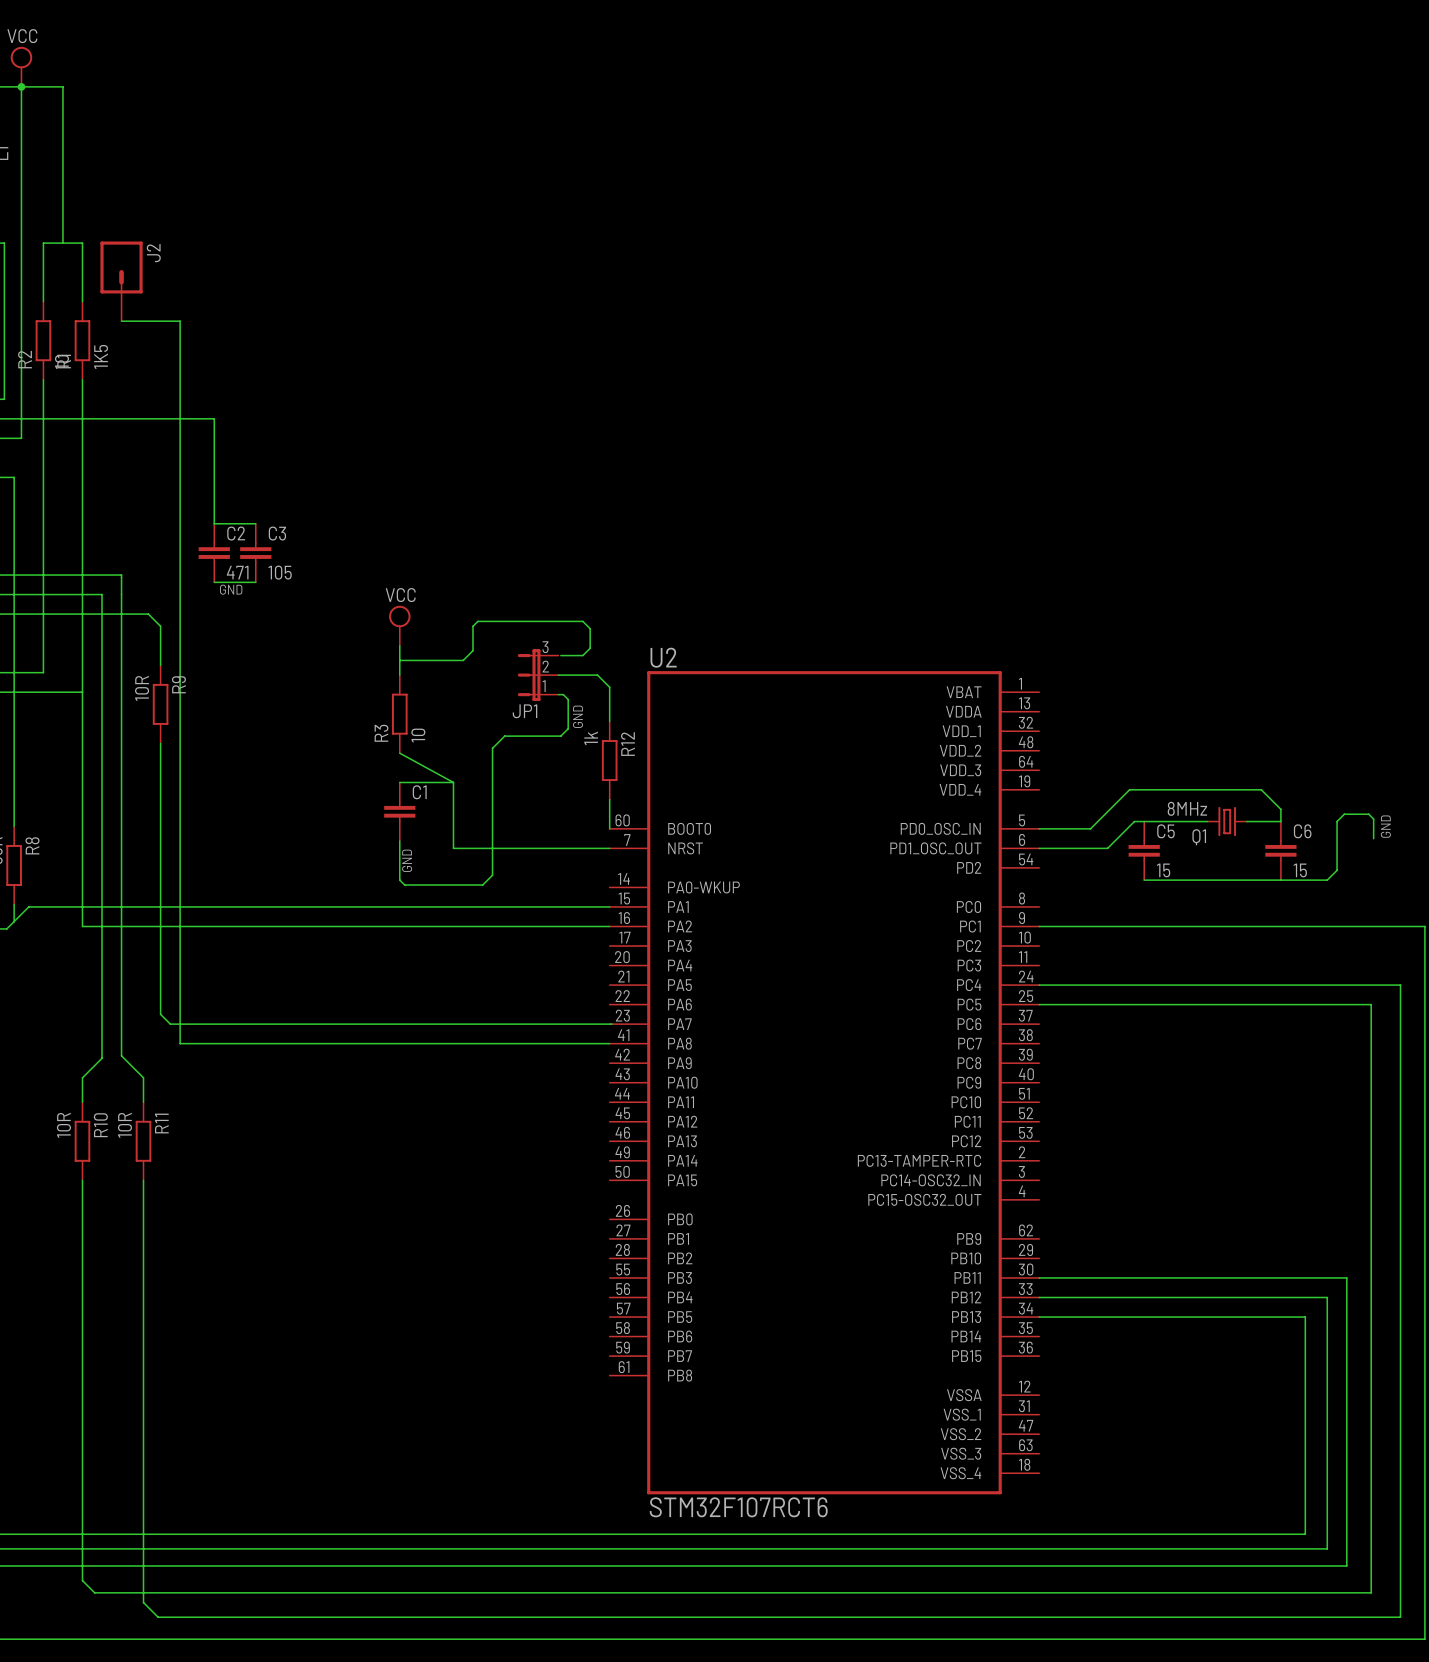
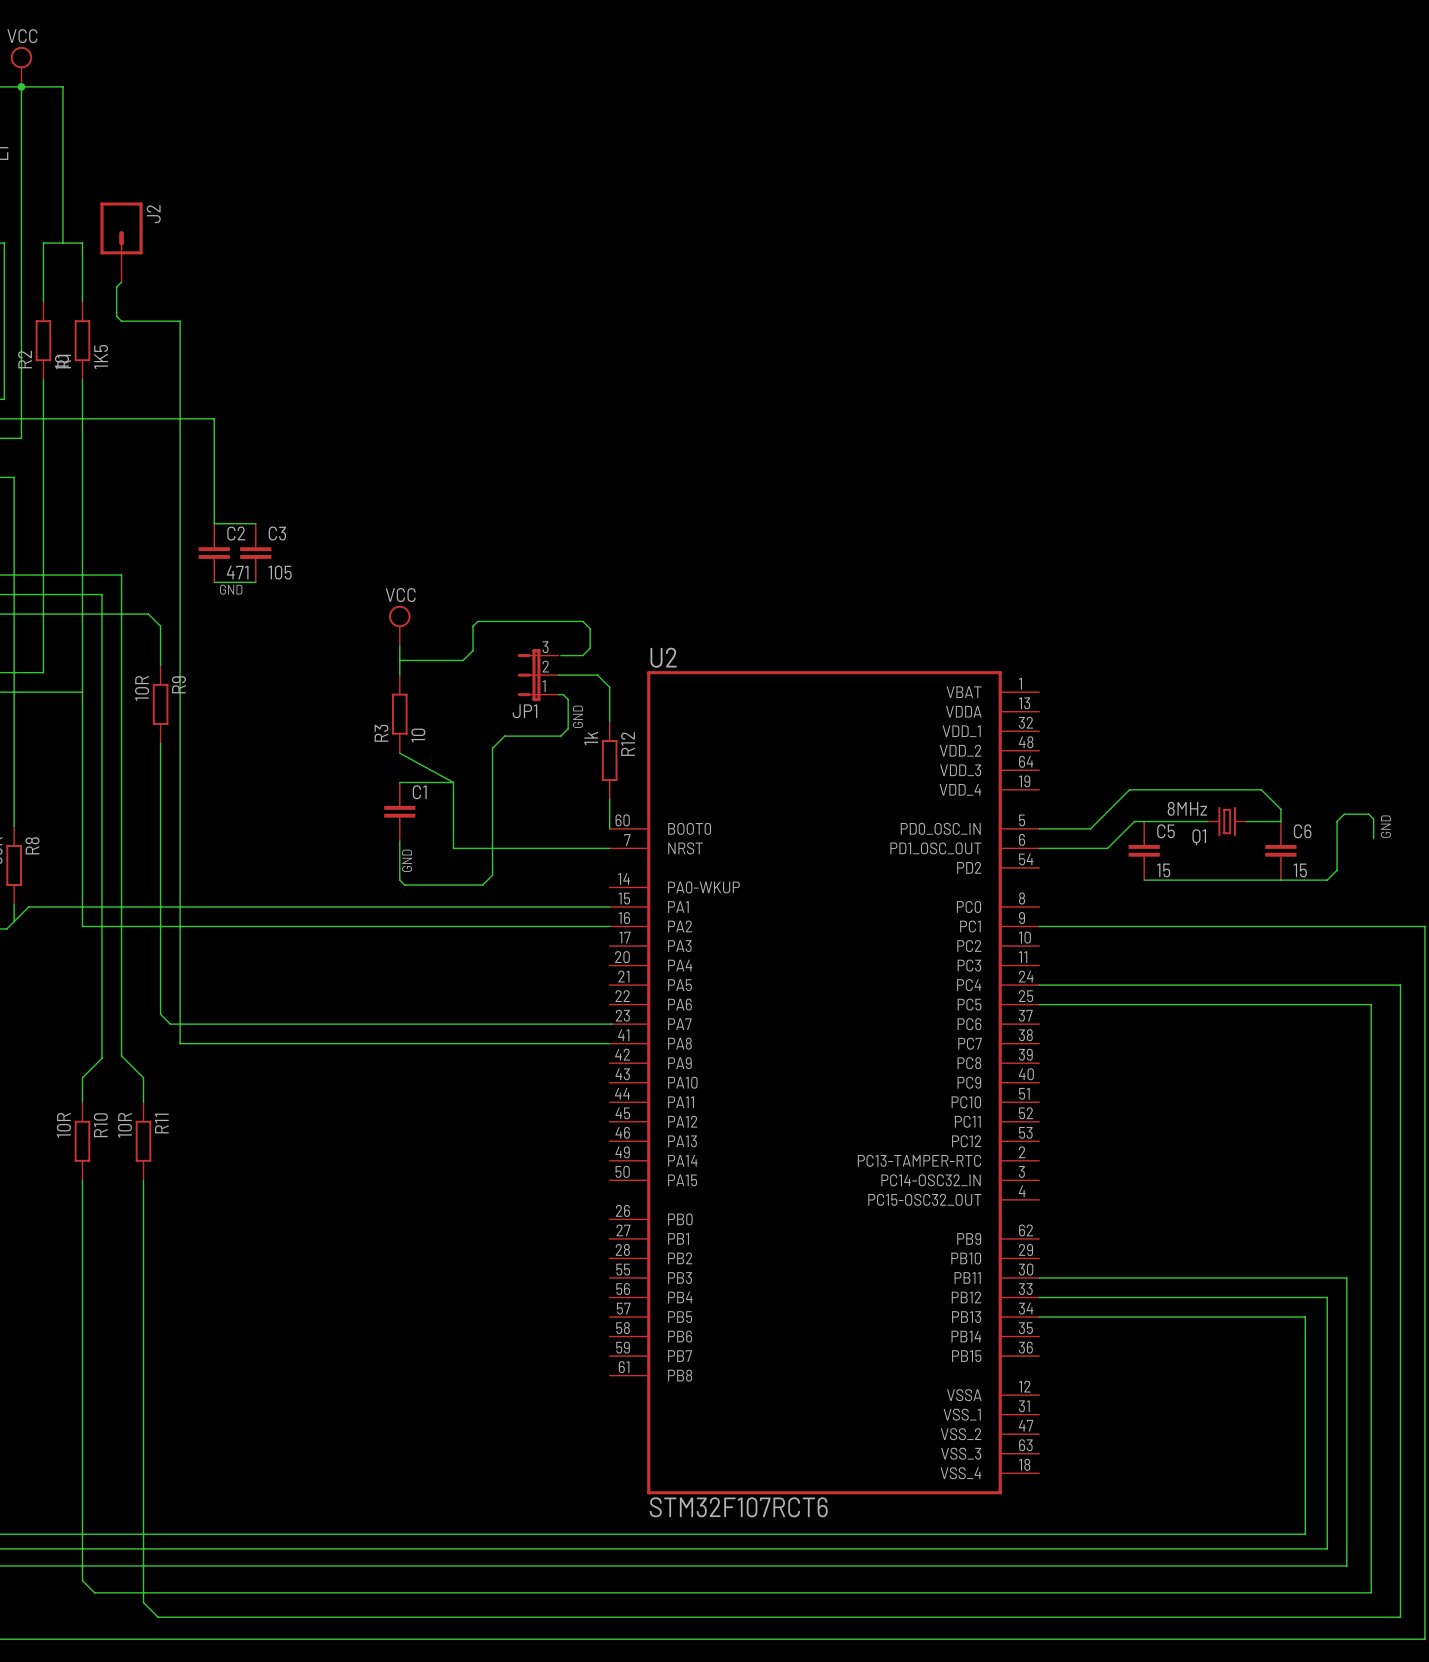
J2 position: (121, 281) -> (121, 242)
wire: none -> (121, 282) (116, 287) (116, 316) (121, 321)

